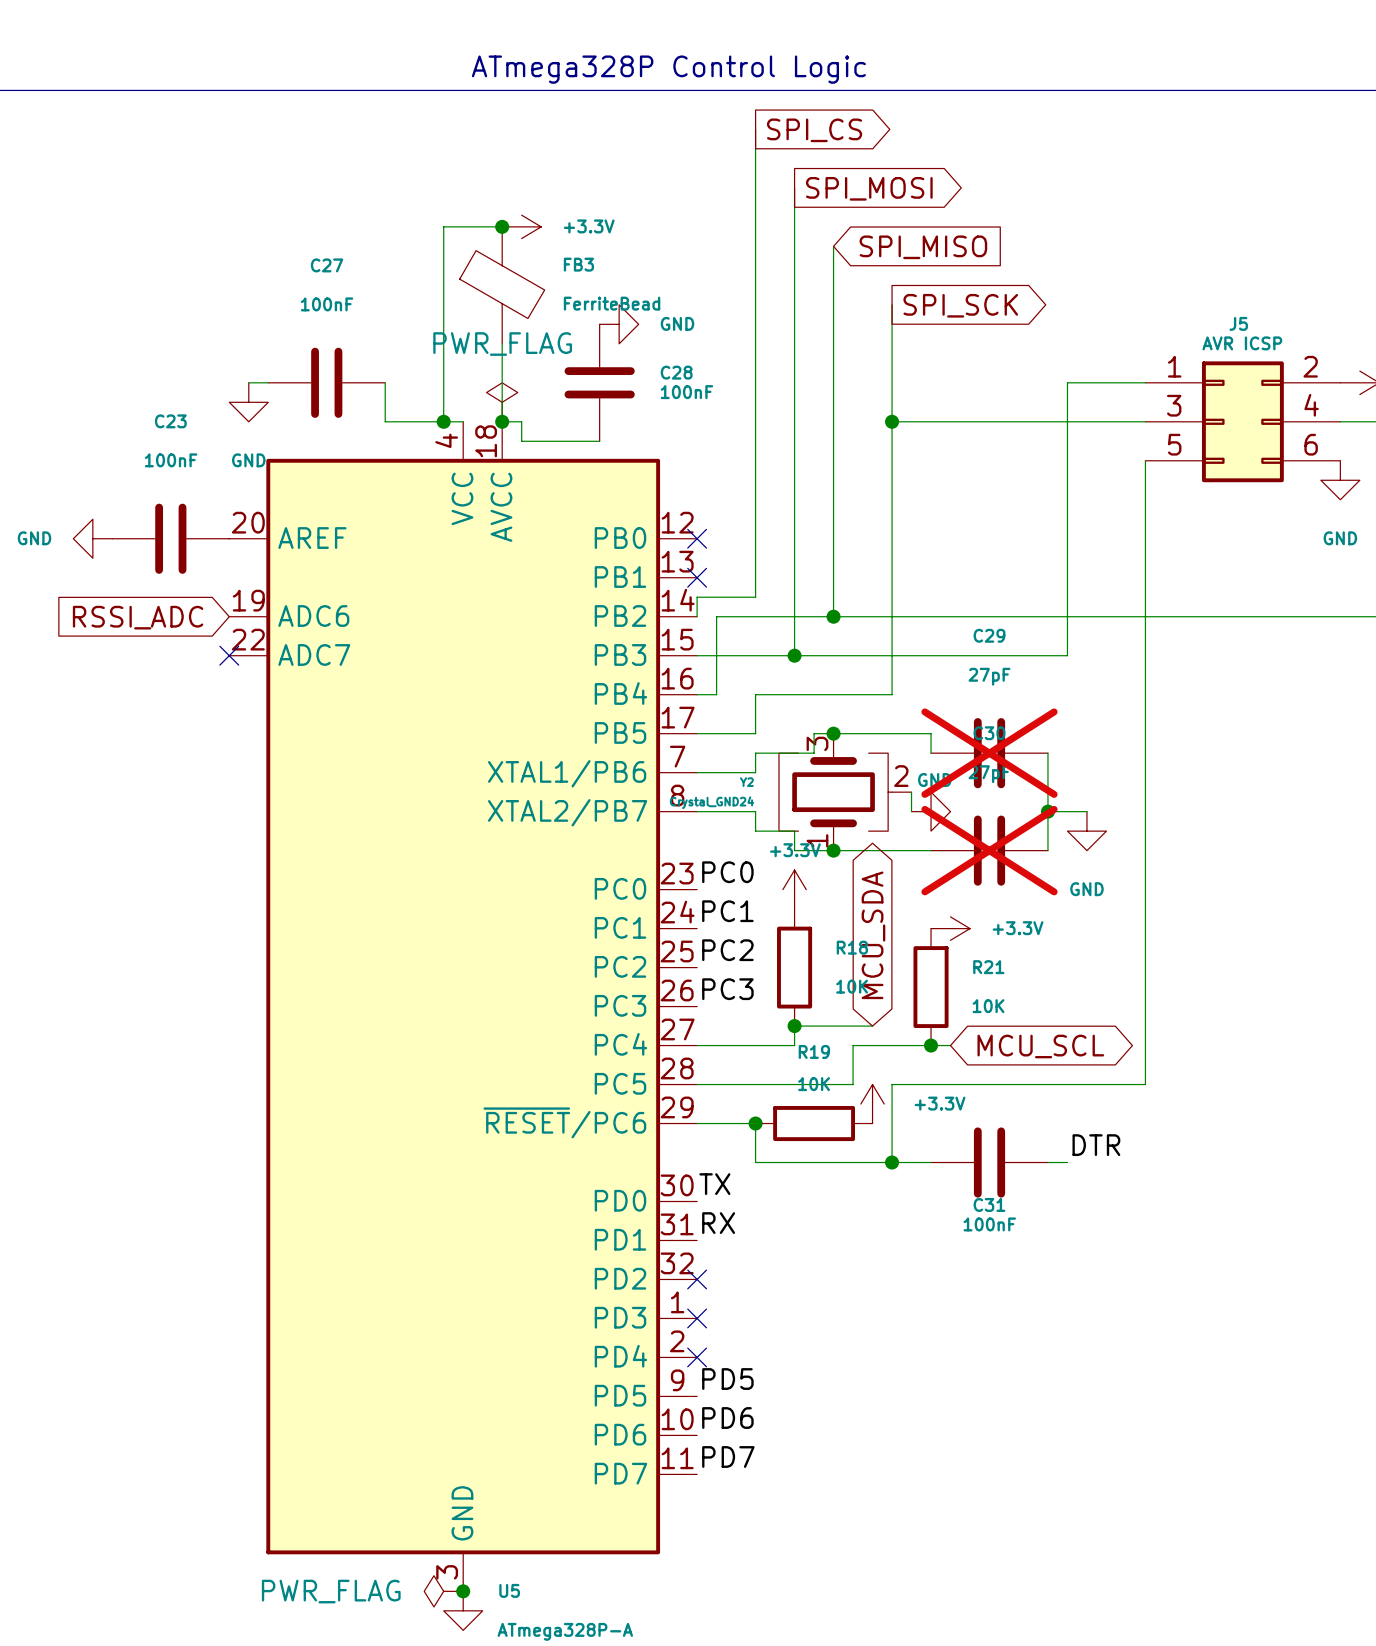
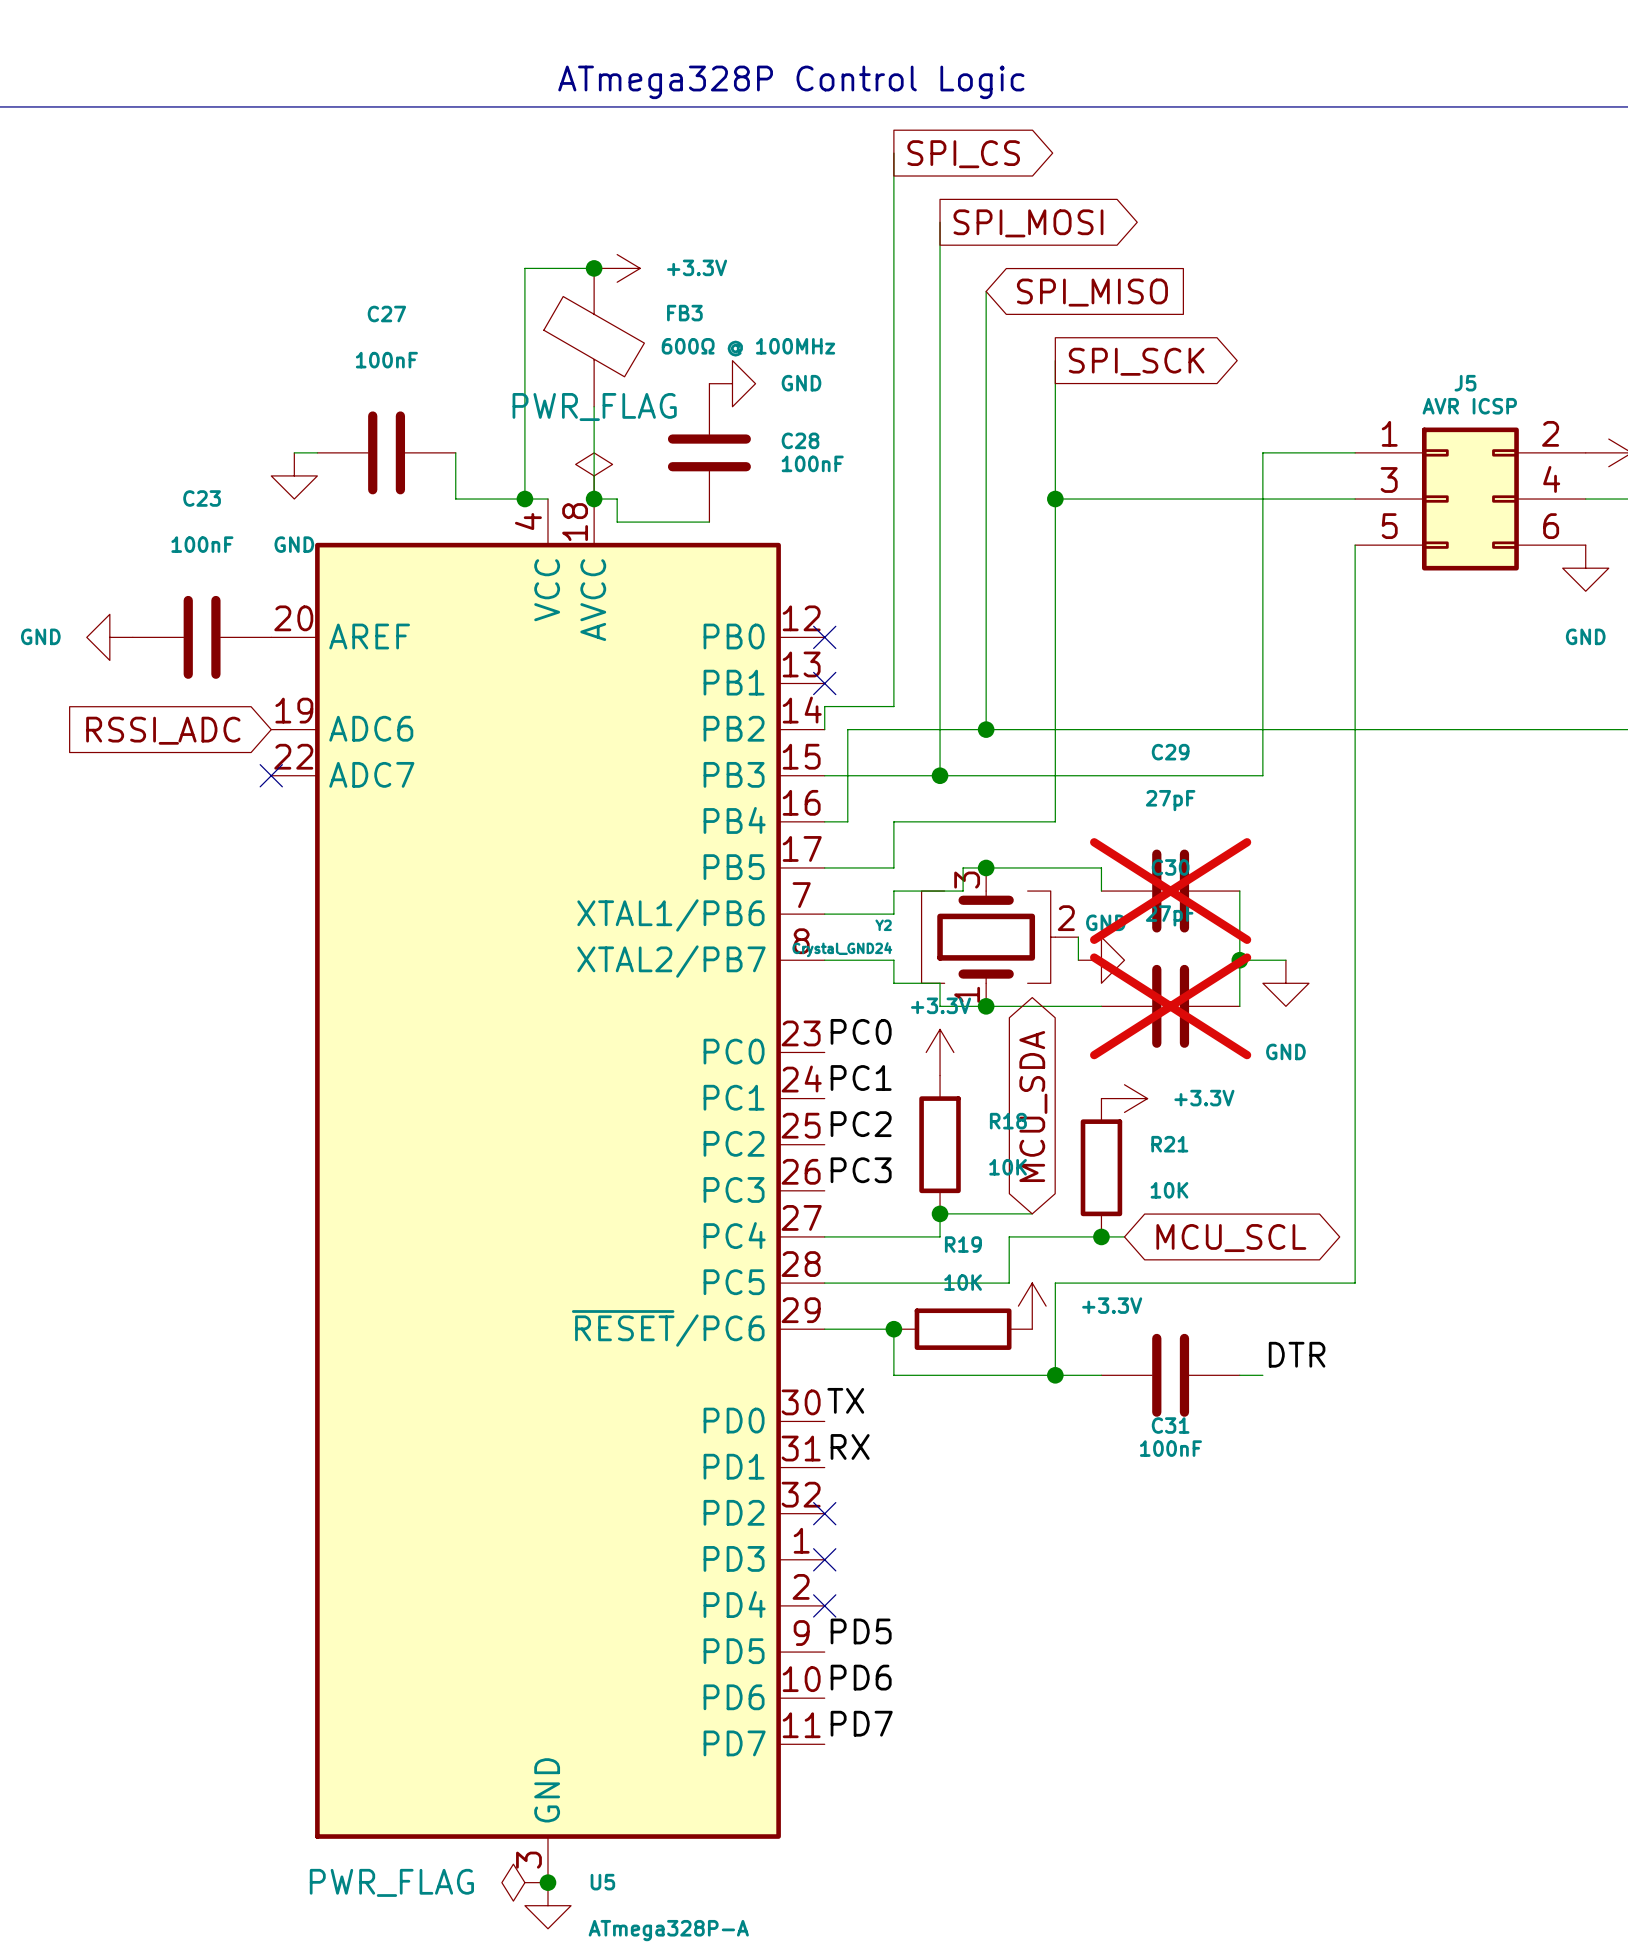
FB3 value: FerriteBead (612, 303) -> 600Ω @ 100MHz (748, 347)

